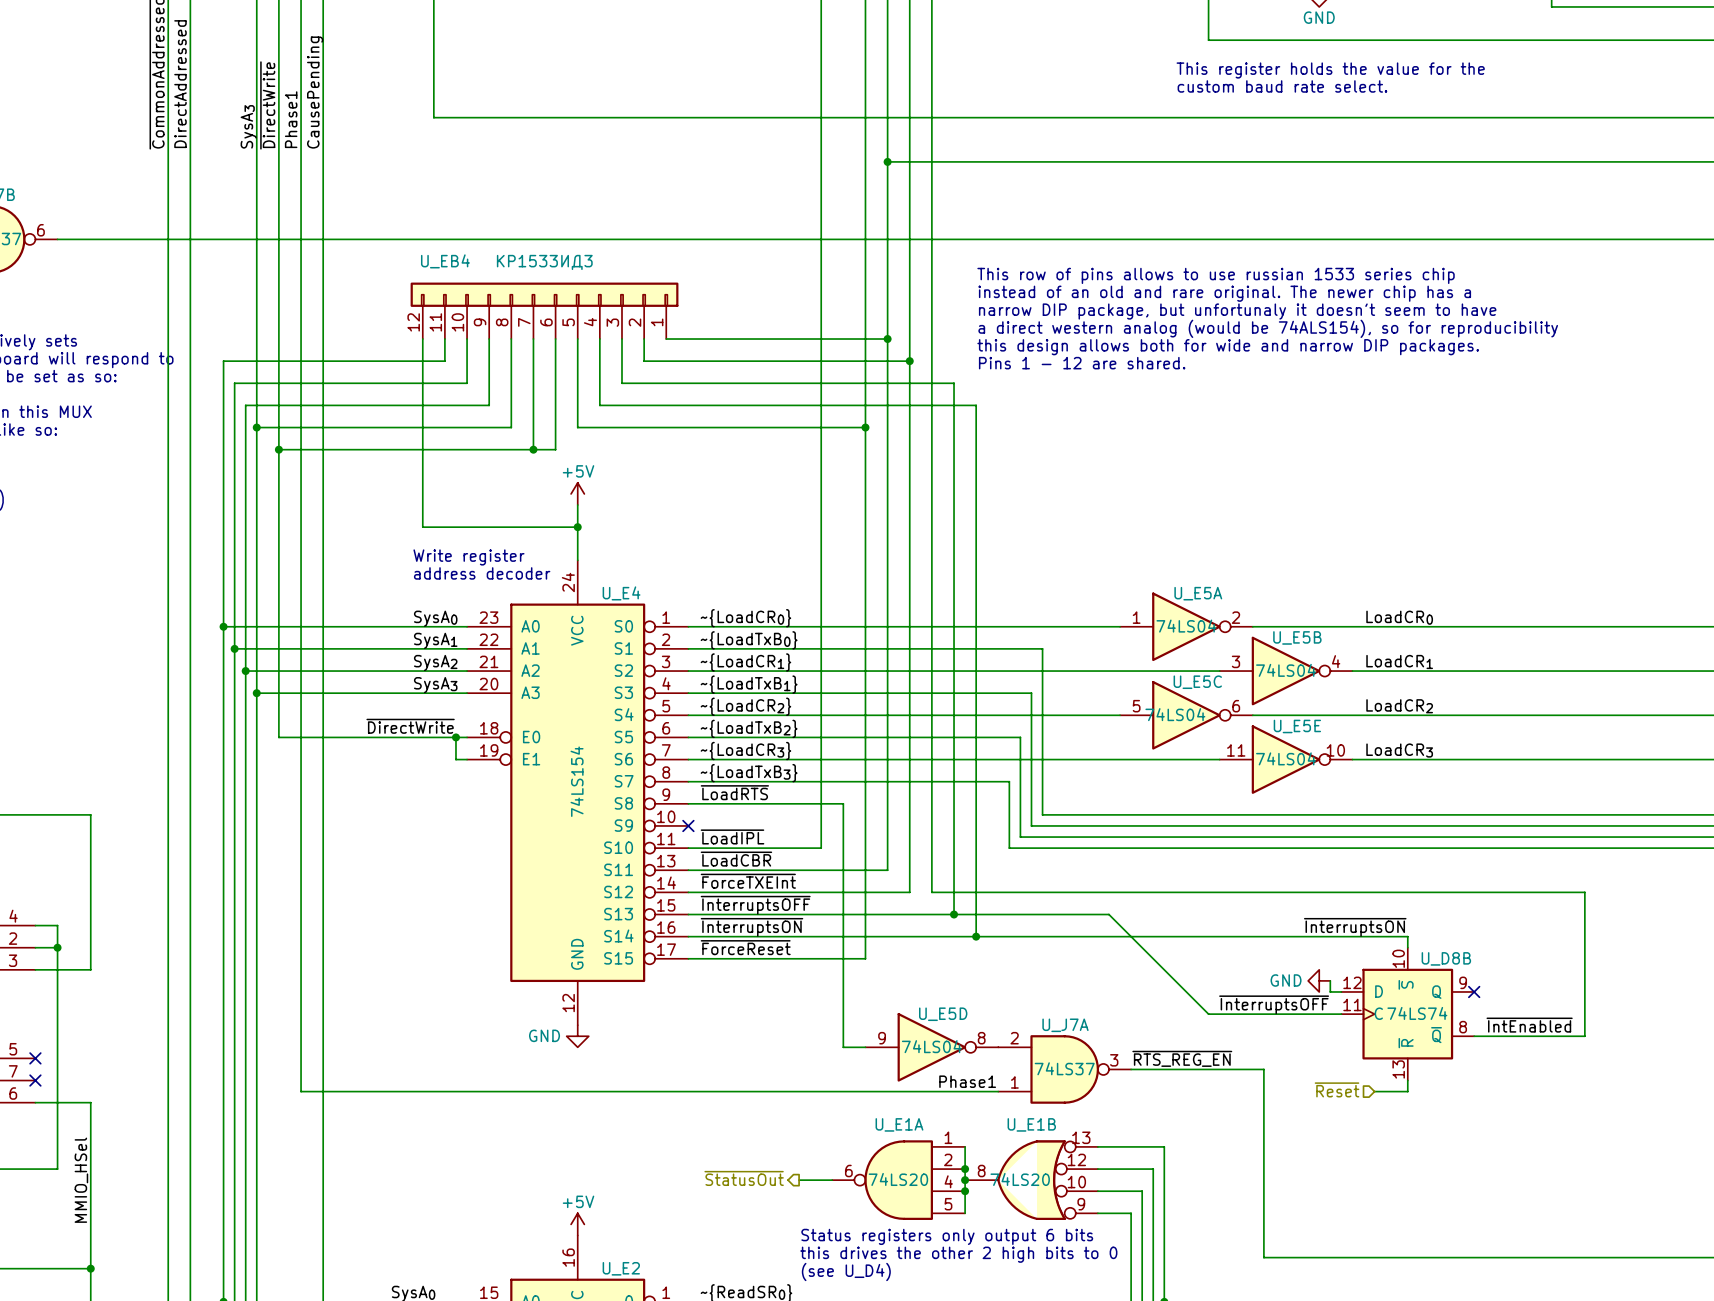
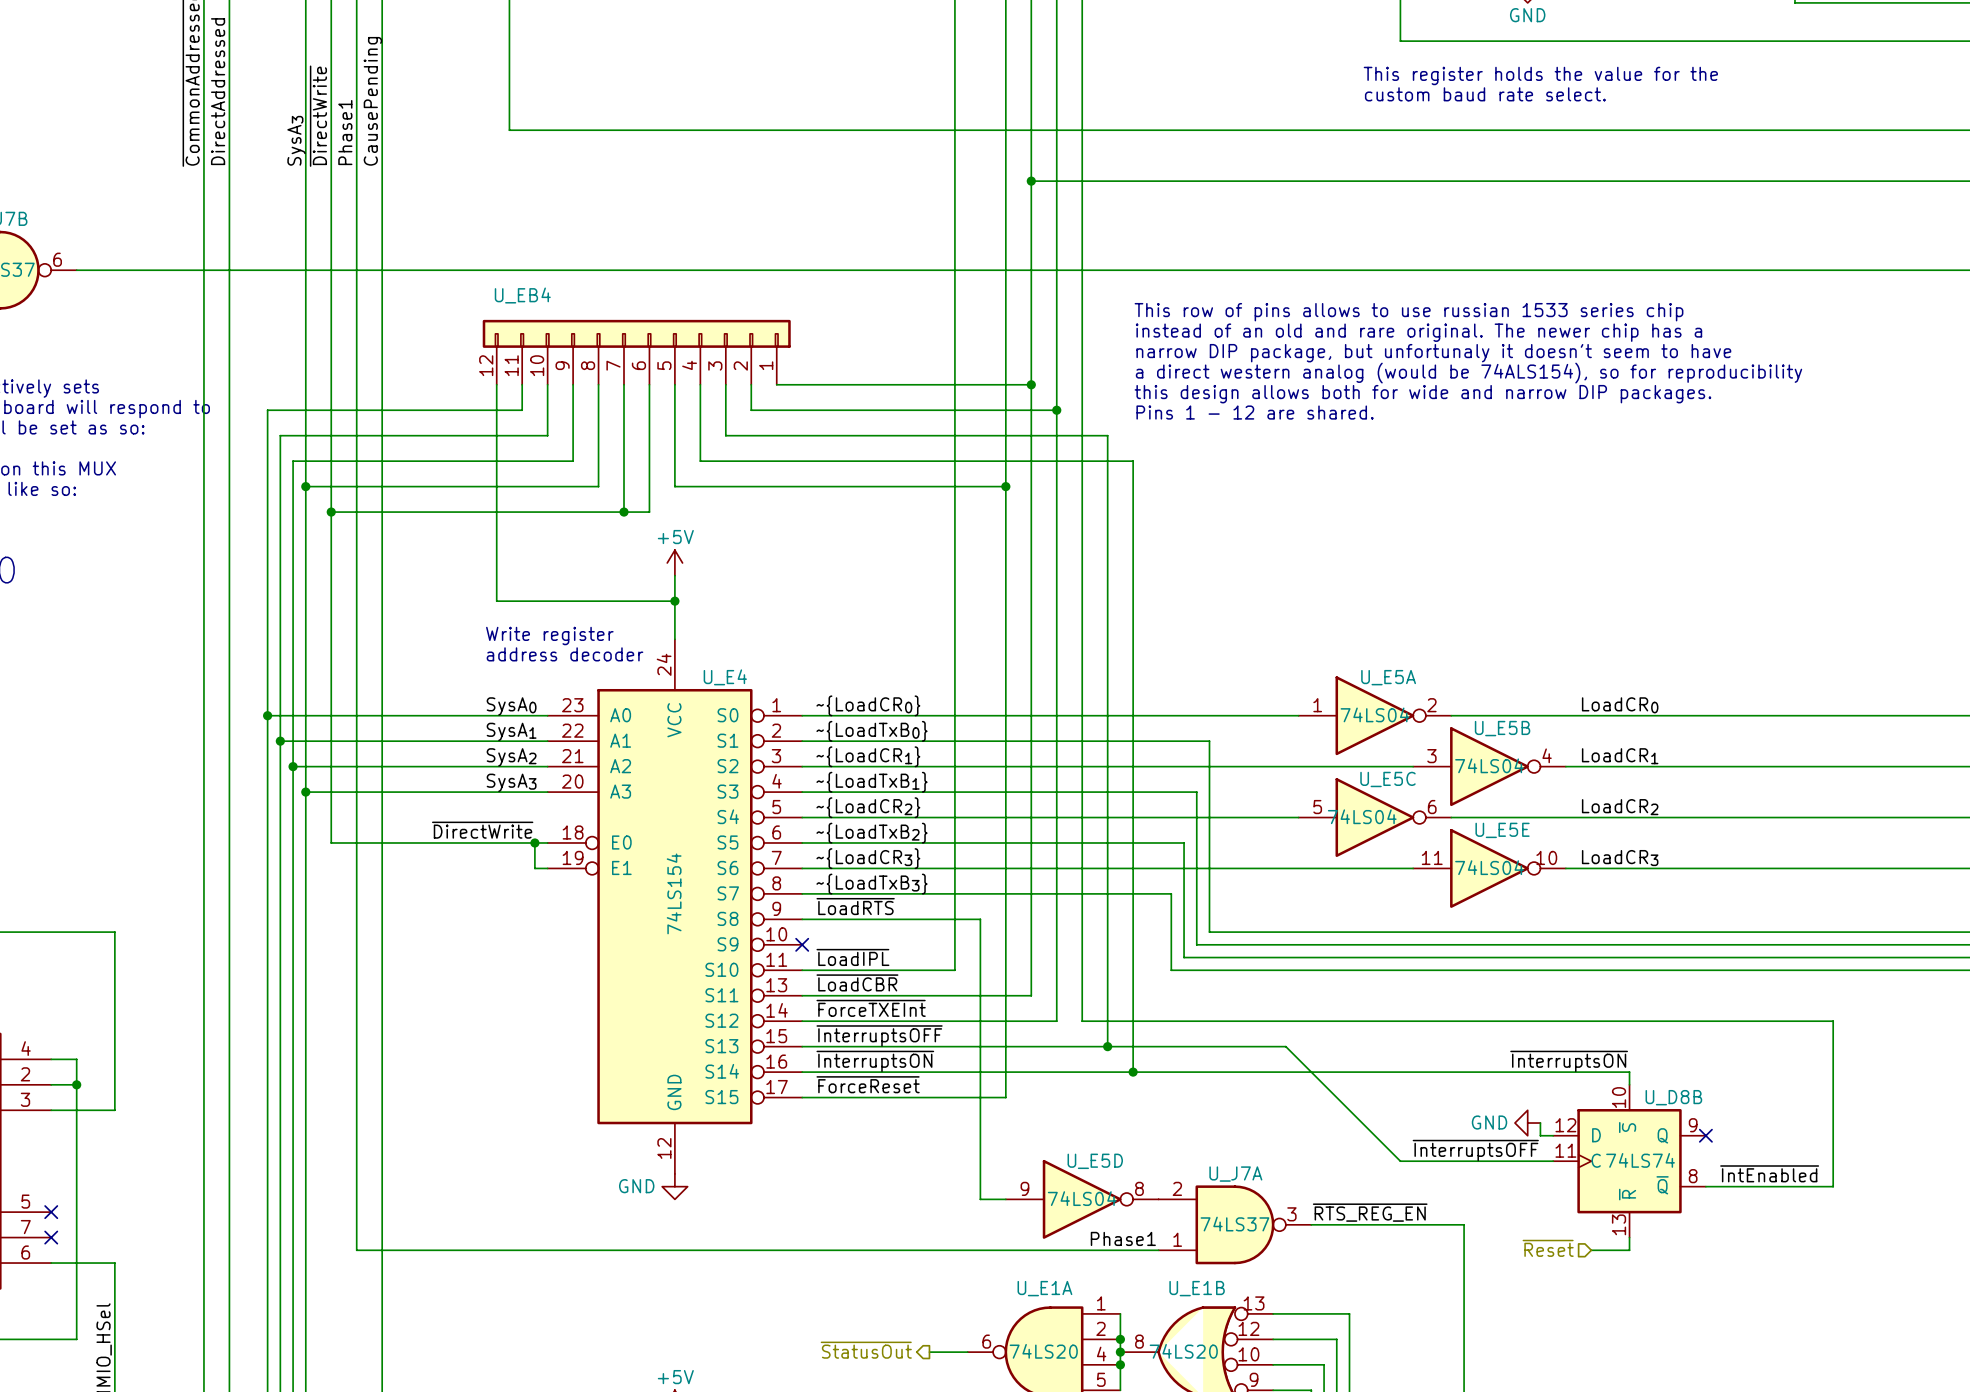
U_EB4 value: КР1533ИД3 (544, 262) -> none

